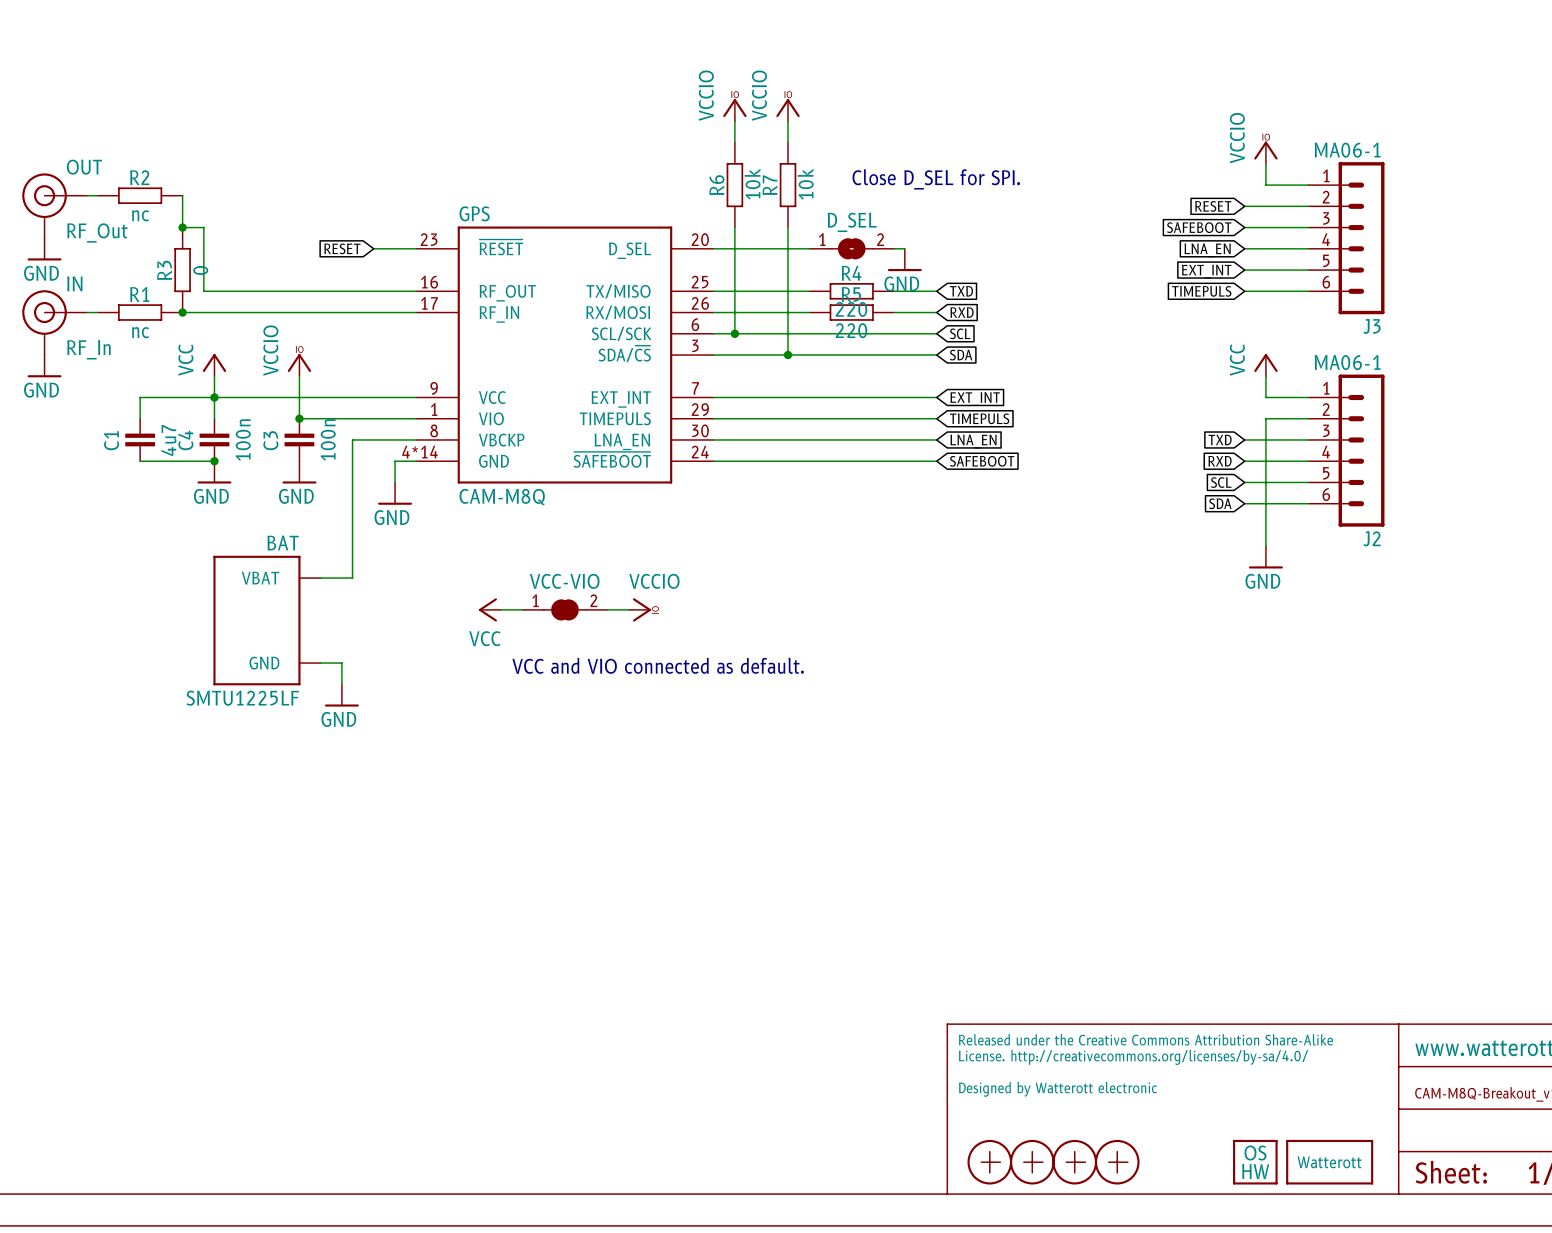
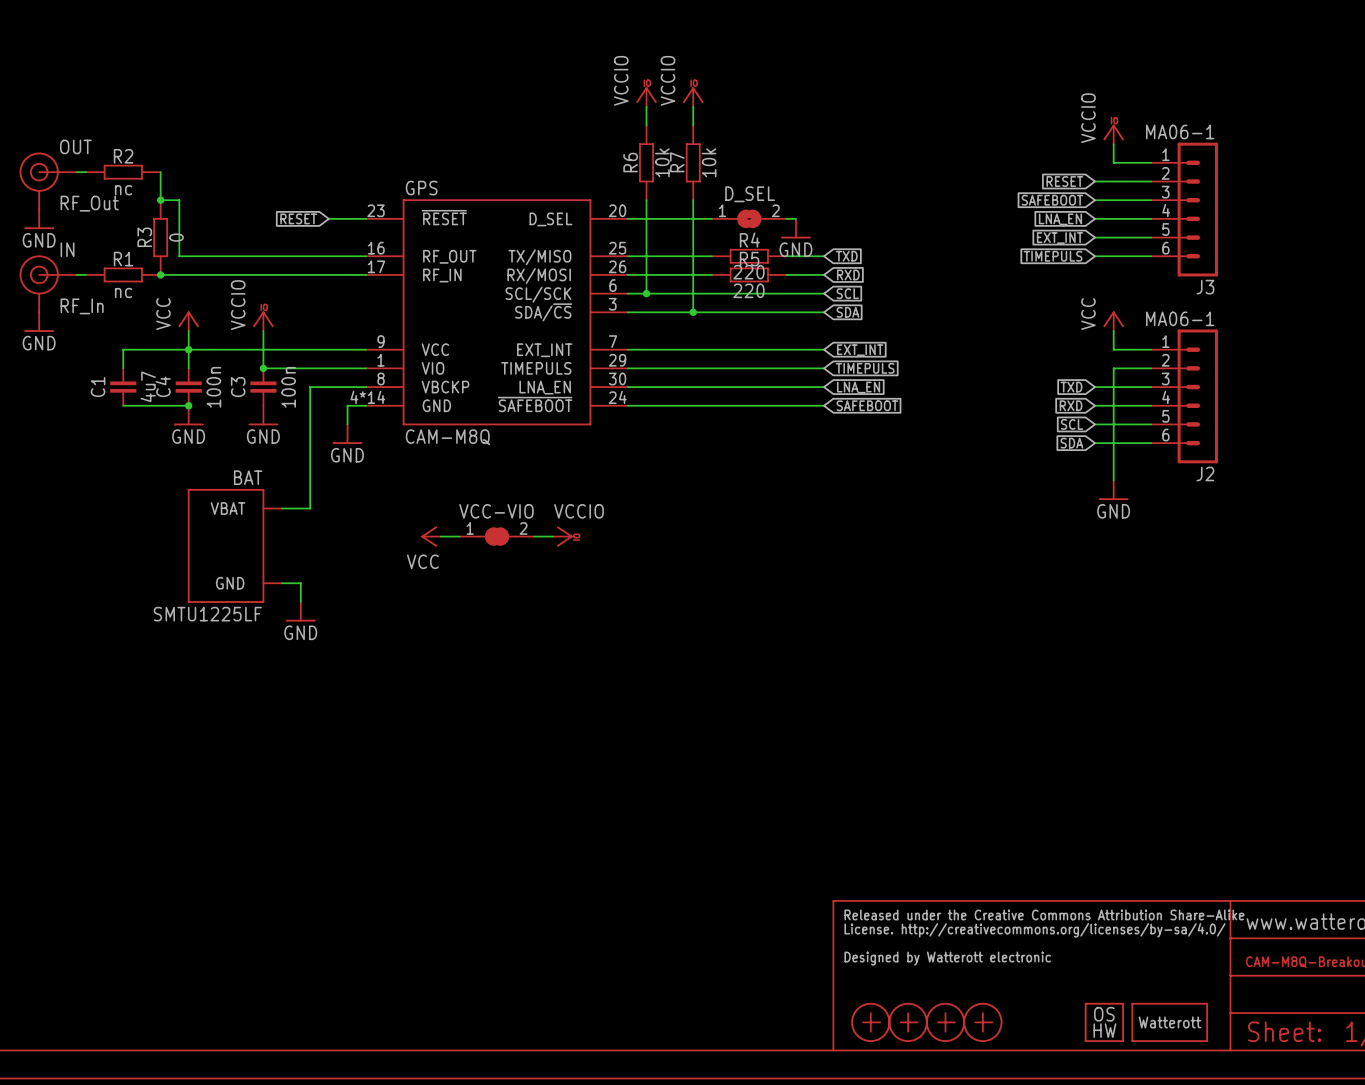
text: Close D_SEL for SPI. (936, 179) -> none
text: VCC and VIO connected as default. (658, 665) -> none

